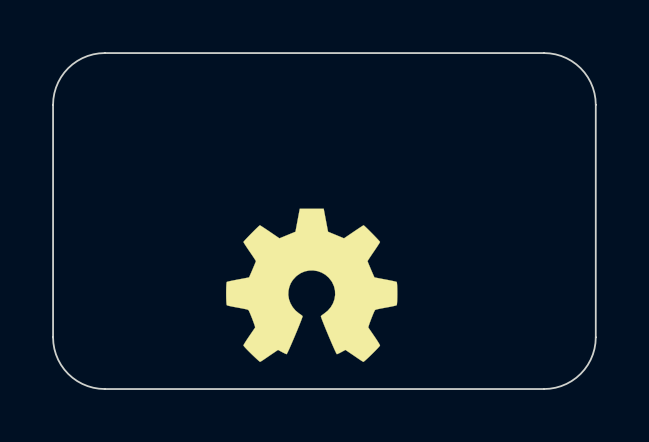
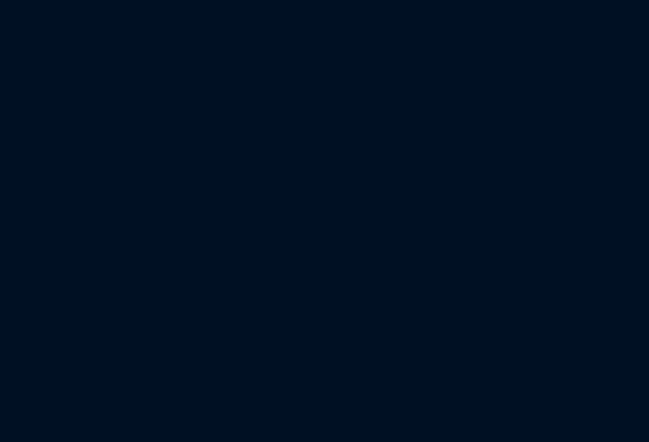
board edge: (104, 53) (544, 53) (555, 54) (571, 60) (587, 77) (592, 87) (595, 104) (595, 337) (592, 354) (587, 364) (580, 373) (566, 383) (544, 389) (104, 389) (87, 386) (77, 381) (60, 364) (53, 343) (53, 98) (58, 82) (68, 68) (82, 58) (104, 53) -> none
drawing: [226, 208, 398, 362] -> none

